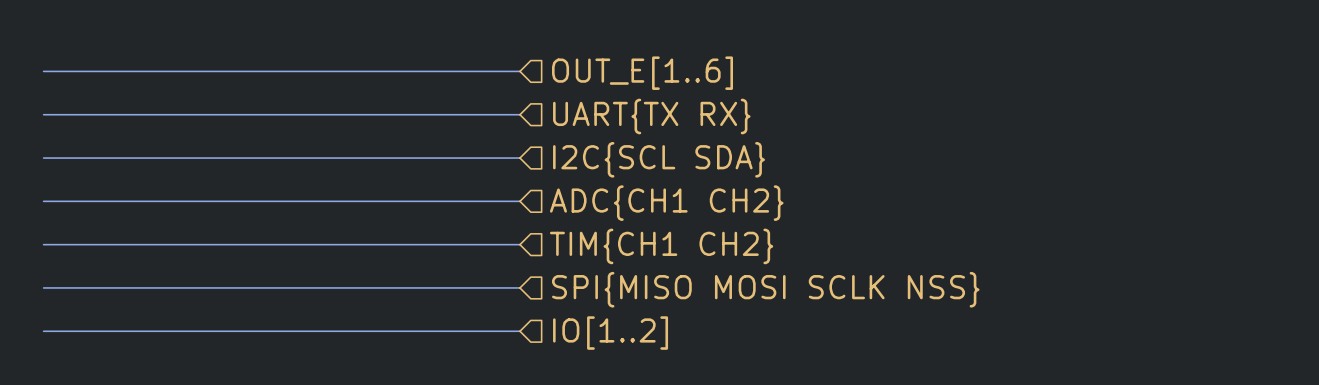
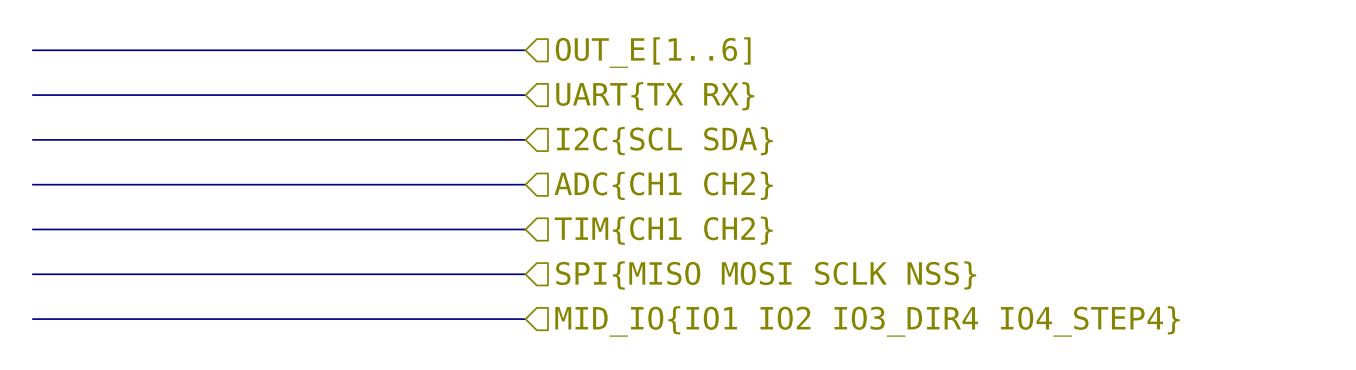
hierarchical label: IO[1..2] (610, 333) -> MID_IO{IO1 IO2 IO3_DIR4 IO4_STEP4} (867, 321)

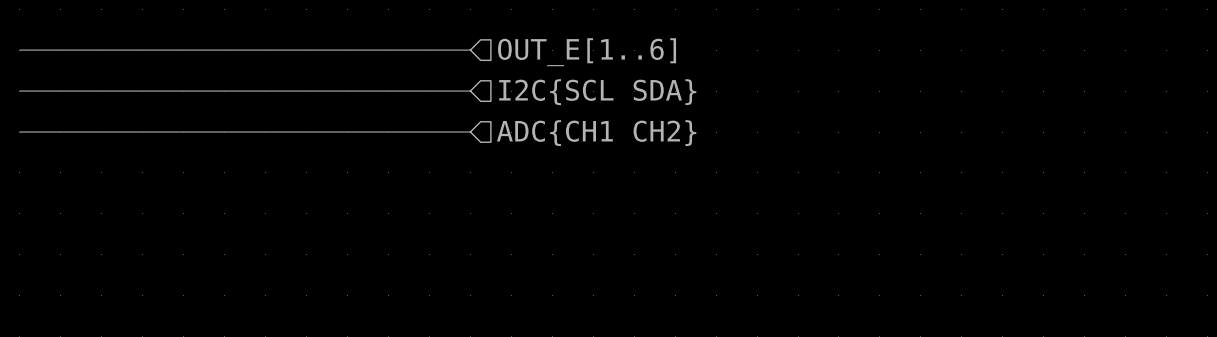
hierarchical label: UART{TX RX} (655, 96) -> I2C{SCL SDA} (597, 92)
hierarchical label: I2C{SCL SDA} (664, 141) -> ADC{CH1 CH2} (596, 133)
bus: (32, 184) (525, 184) -> none
hierarchical label: ADC{CH1 CH2} (663, 185) -> none
bus: (32, 229) (525, 229) -> none
hierarchical label: TIM{CH1 CH2} (663, 230) -> none
bus: (32, 274) (525, 274) -> none
hierarchical label: SPI{MISO MOSI SCLK NSS} (766, 275) -> none
bus: (32, 319) (525, 319) -> none
hierarchical label: MID_IO{IO1 IO2 IO3_DIR4 IO4_STEP4} (867, 321) -> none

